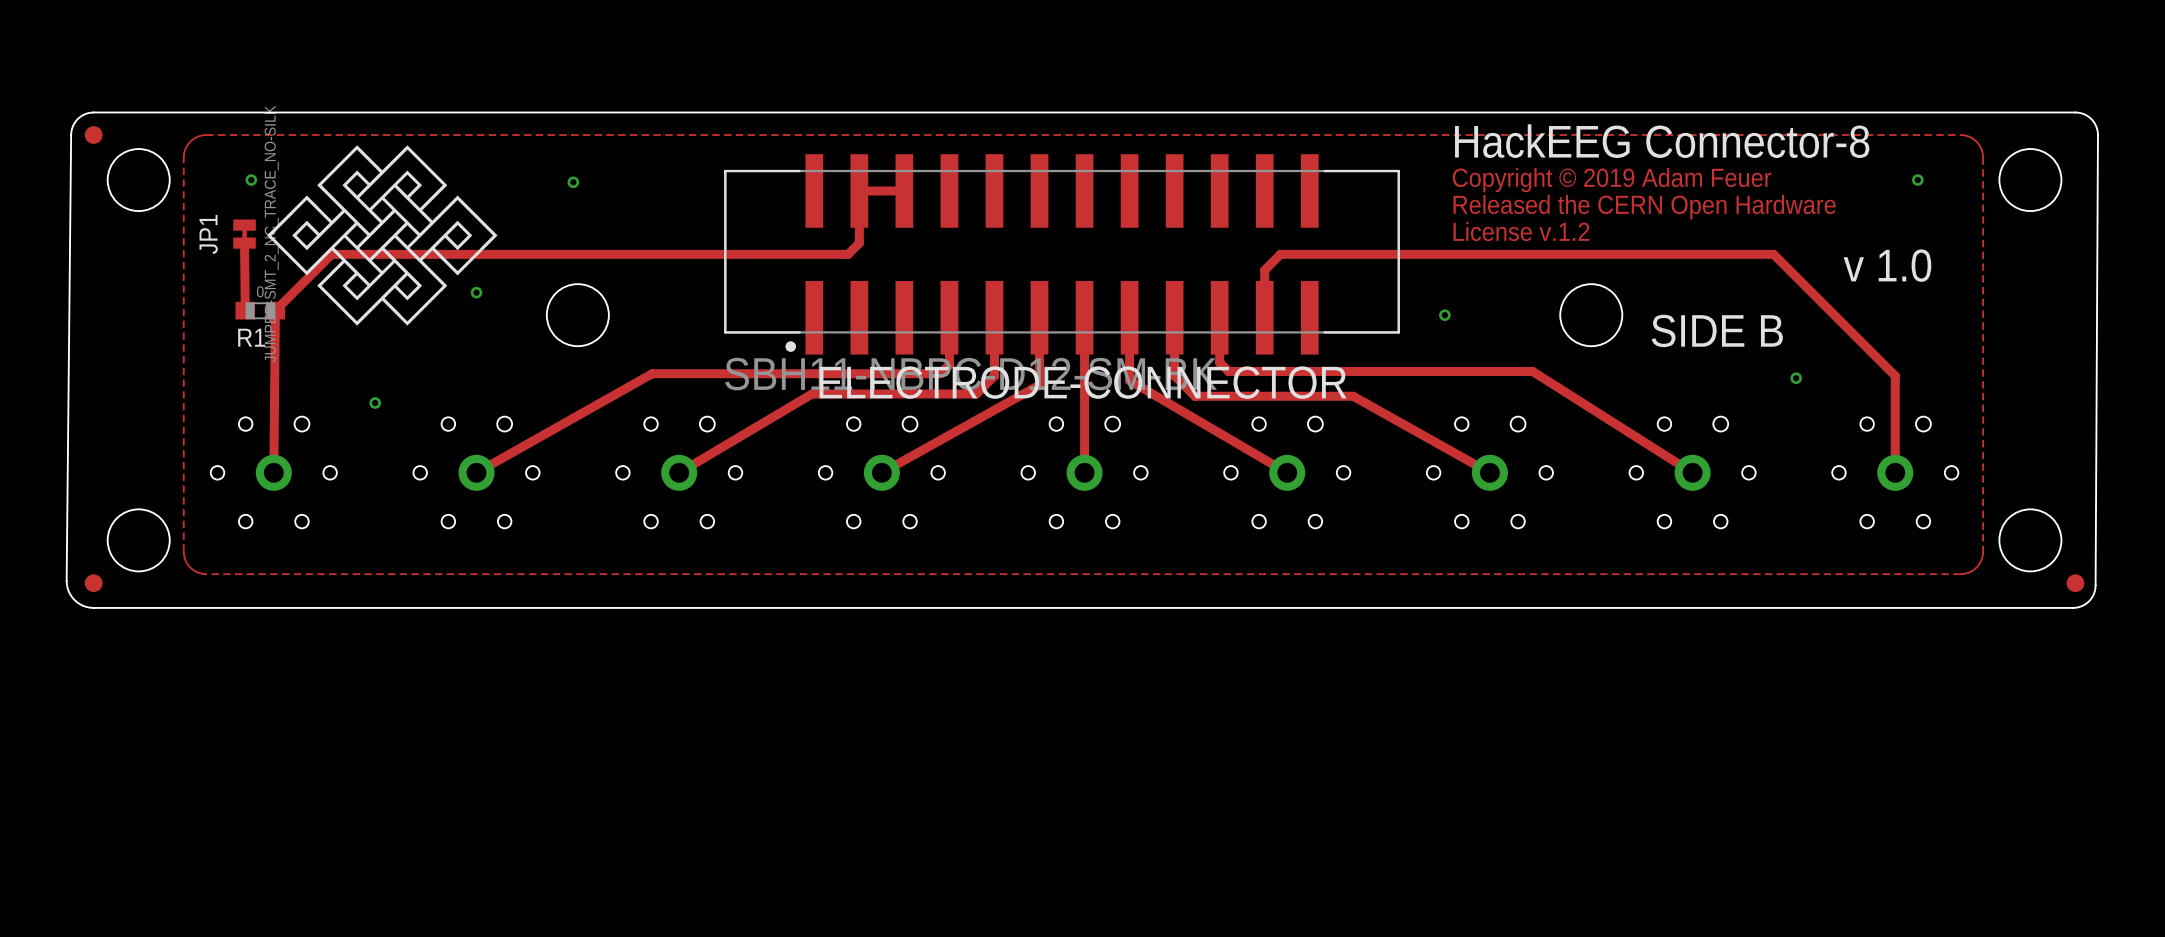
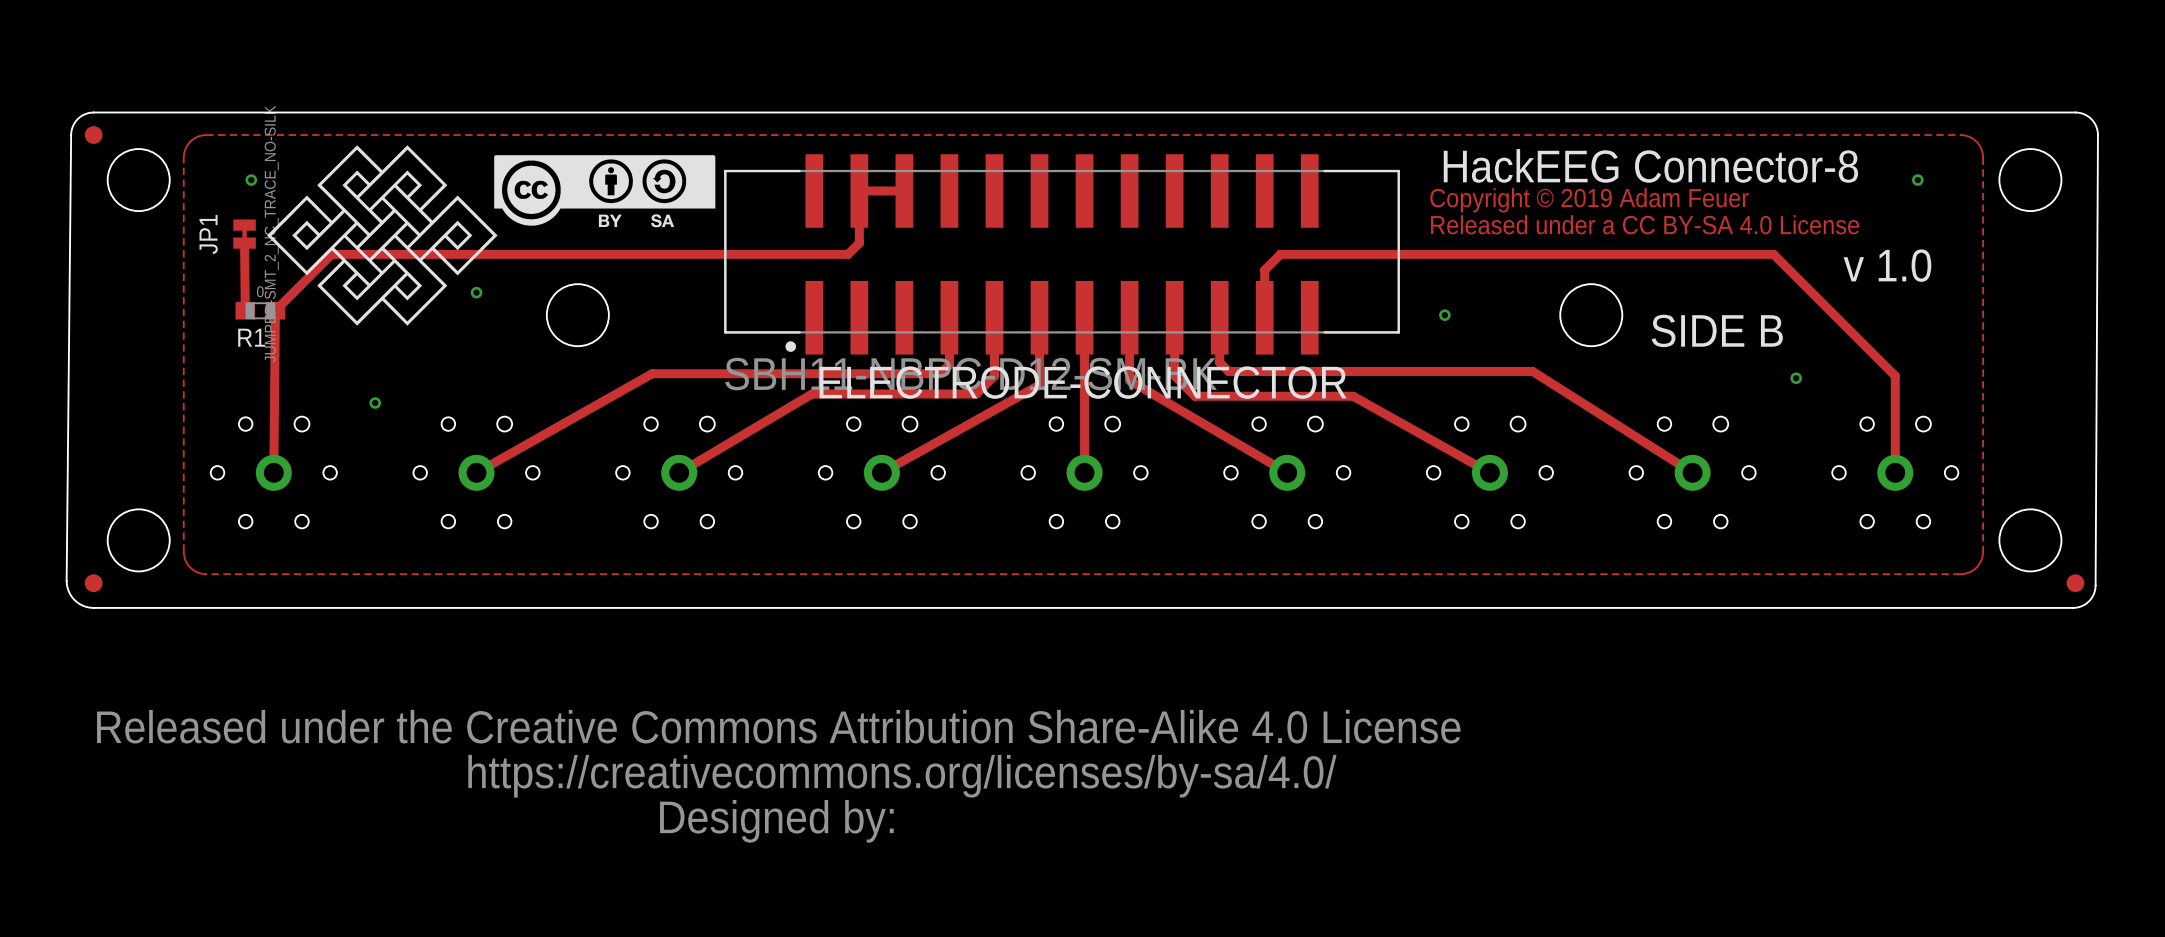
text: HackEEG Connector-8 (1662, 141) -> none
drawing: none -> [494, 155, 716, 228]
text: Copyright © 2019 Adam Feuer (1612, 180) -> HackEEG Connector-8 (1650, 165)
text: none -> Copyright © 2019 Adam Feuer (1589, 200)
text: Released the CERN Open Hardware (1644, 207) -> none
text: none -> Released under a CC BY-SA 4.0 License (1645, 224)
text: License v.1.2 (1521, 231) -> none
drawing: none -> [97, 709, 1461, 843]

